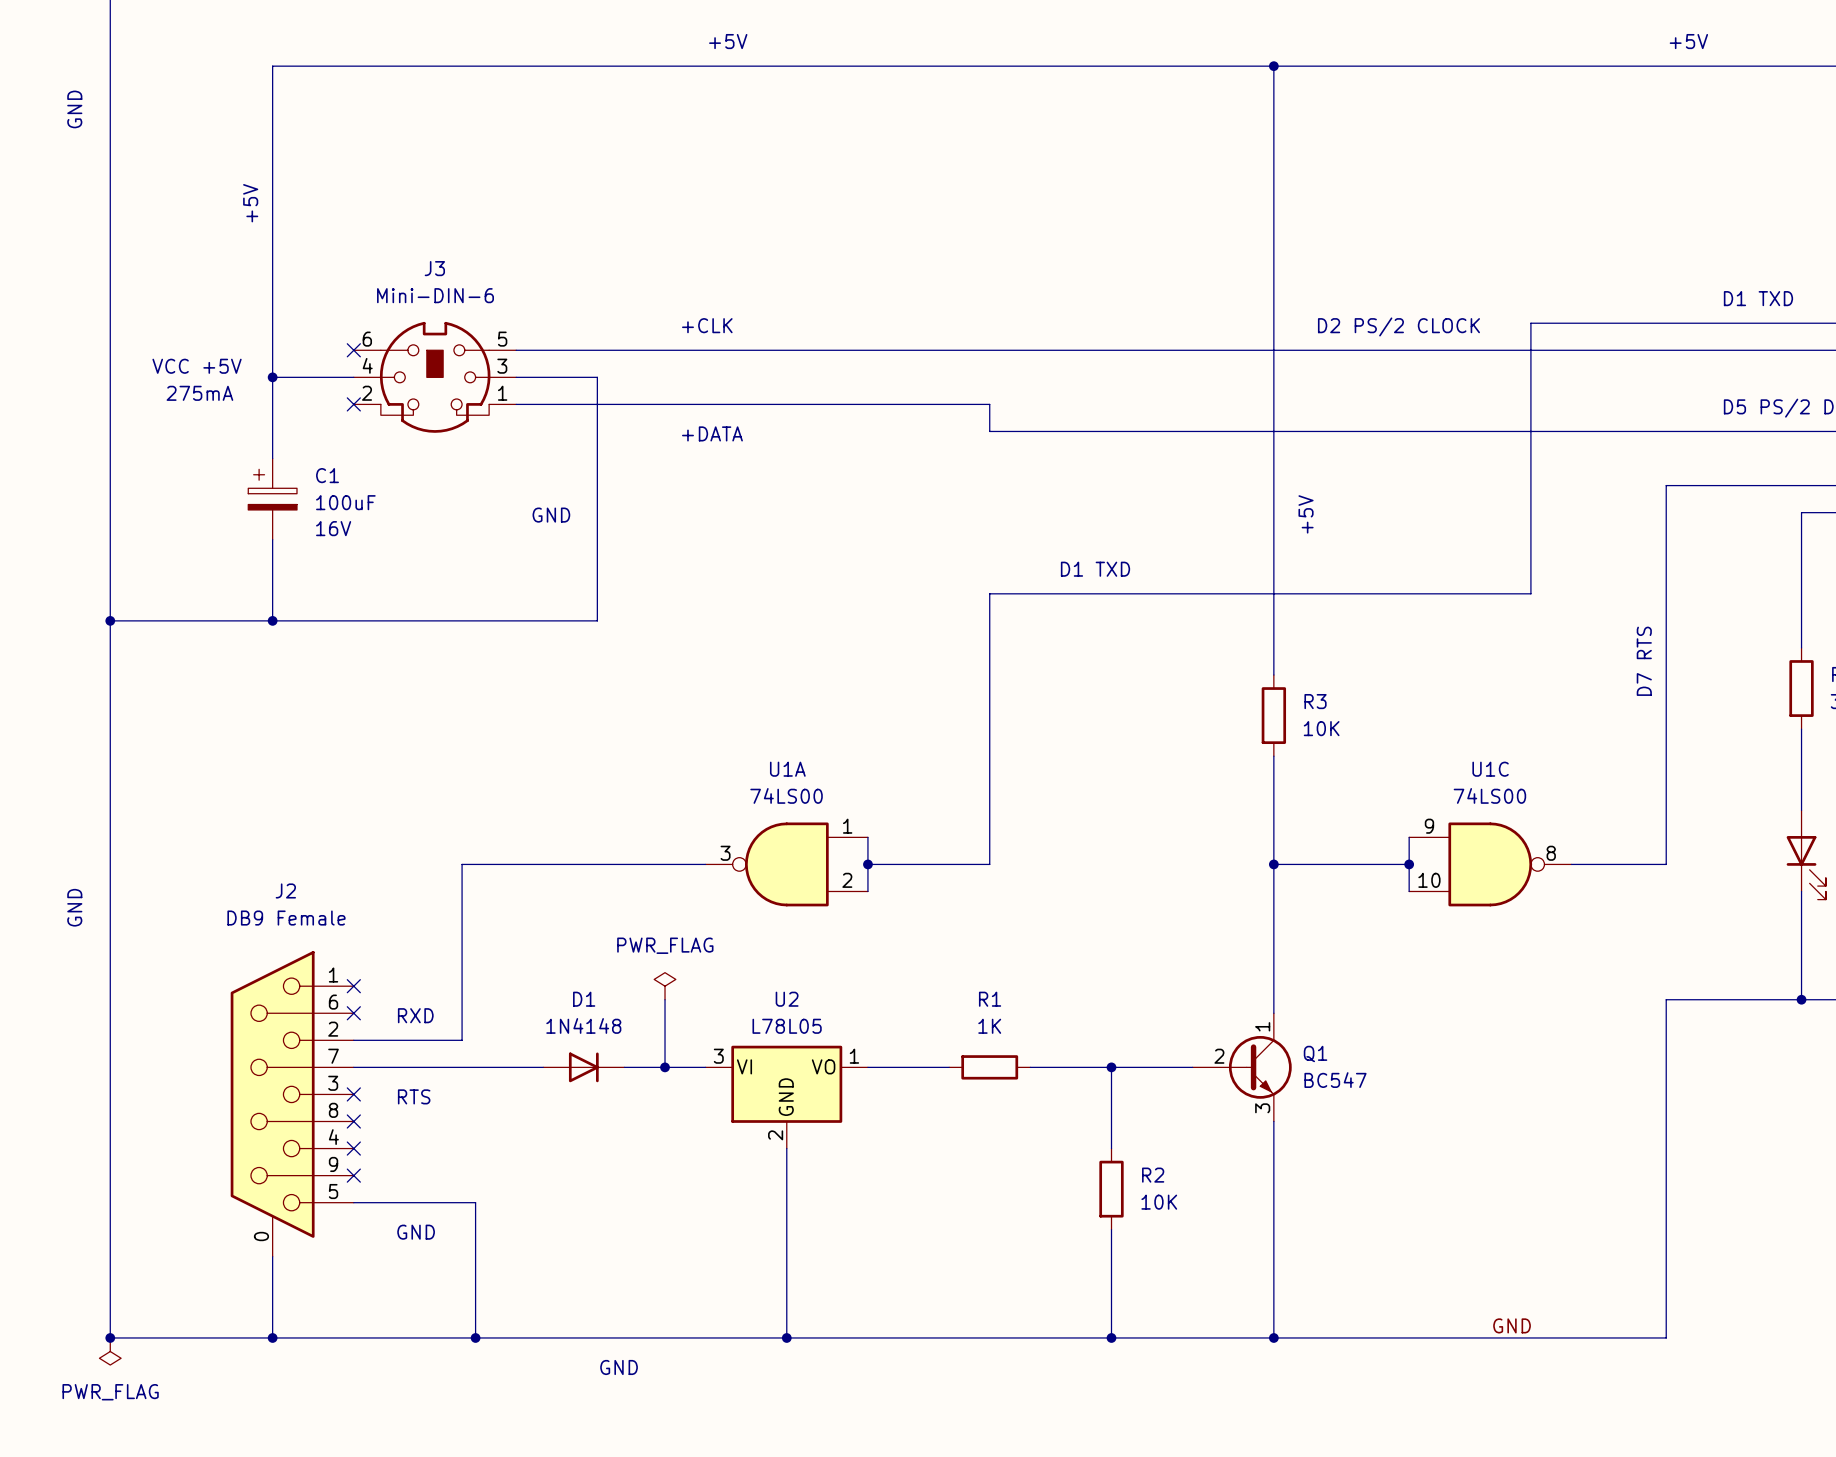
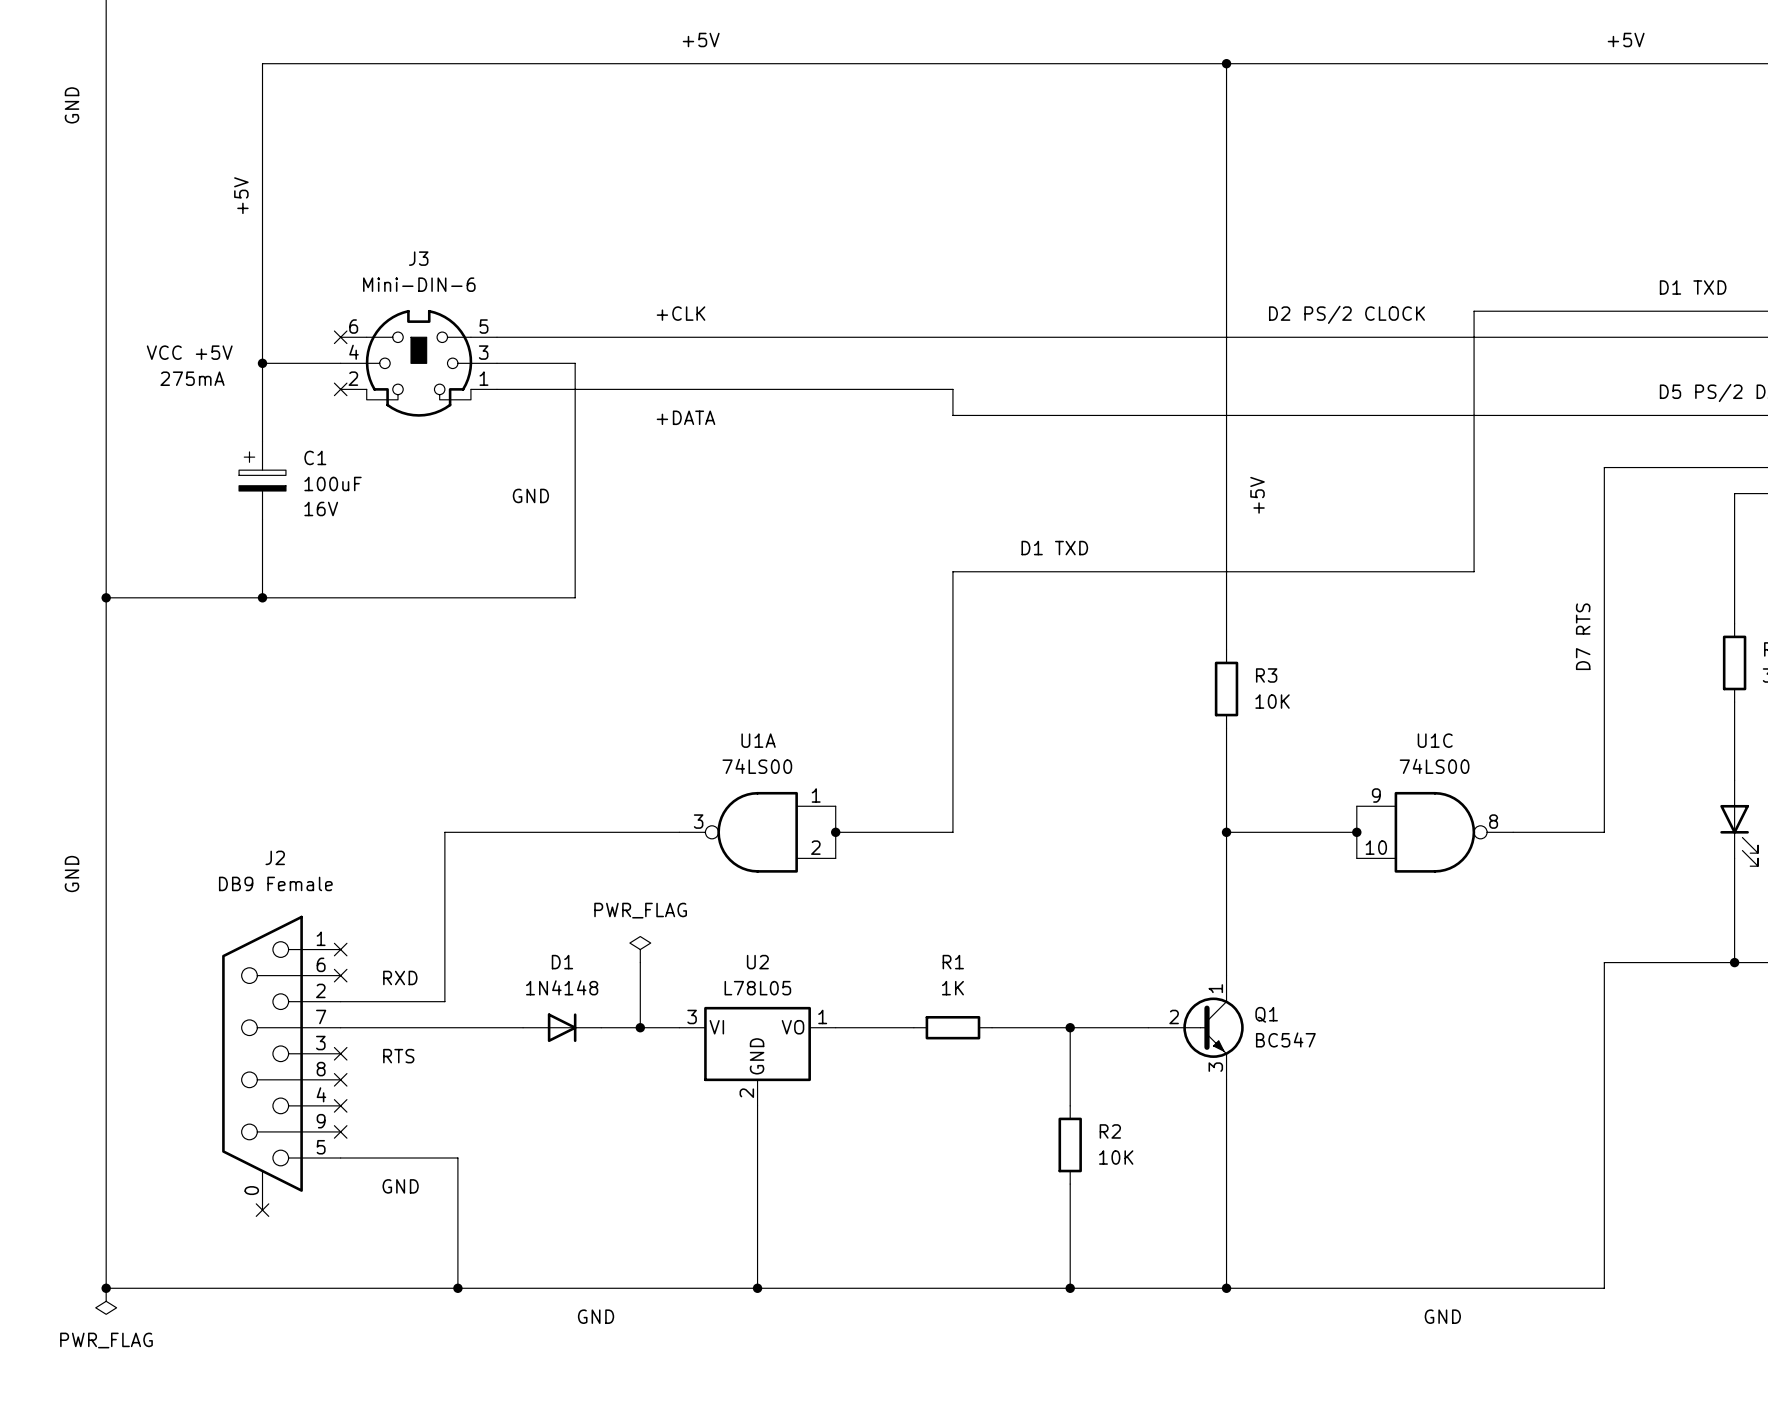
wire: (272, 1256) (272, 1337) -> none
no-connect mark: none -> (262, 1210)
label: GND (1512, 1325) -> none
junction: (272, 1337) -> none
text: none -> GND (1442, 1316)

